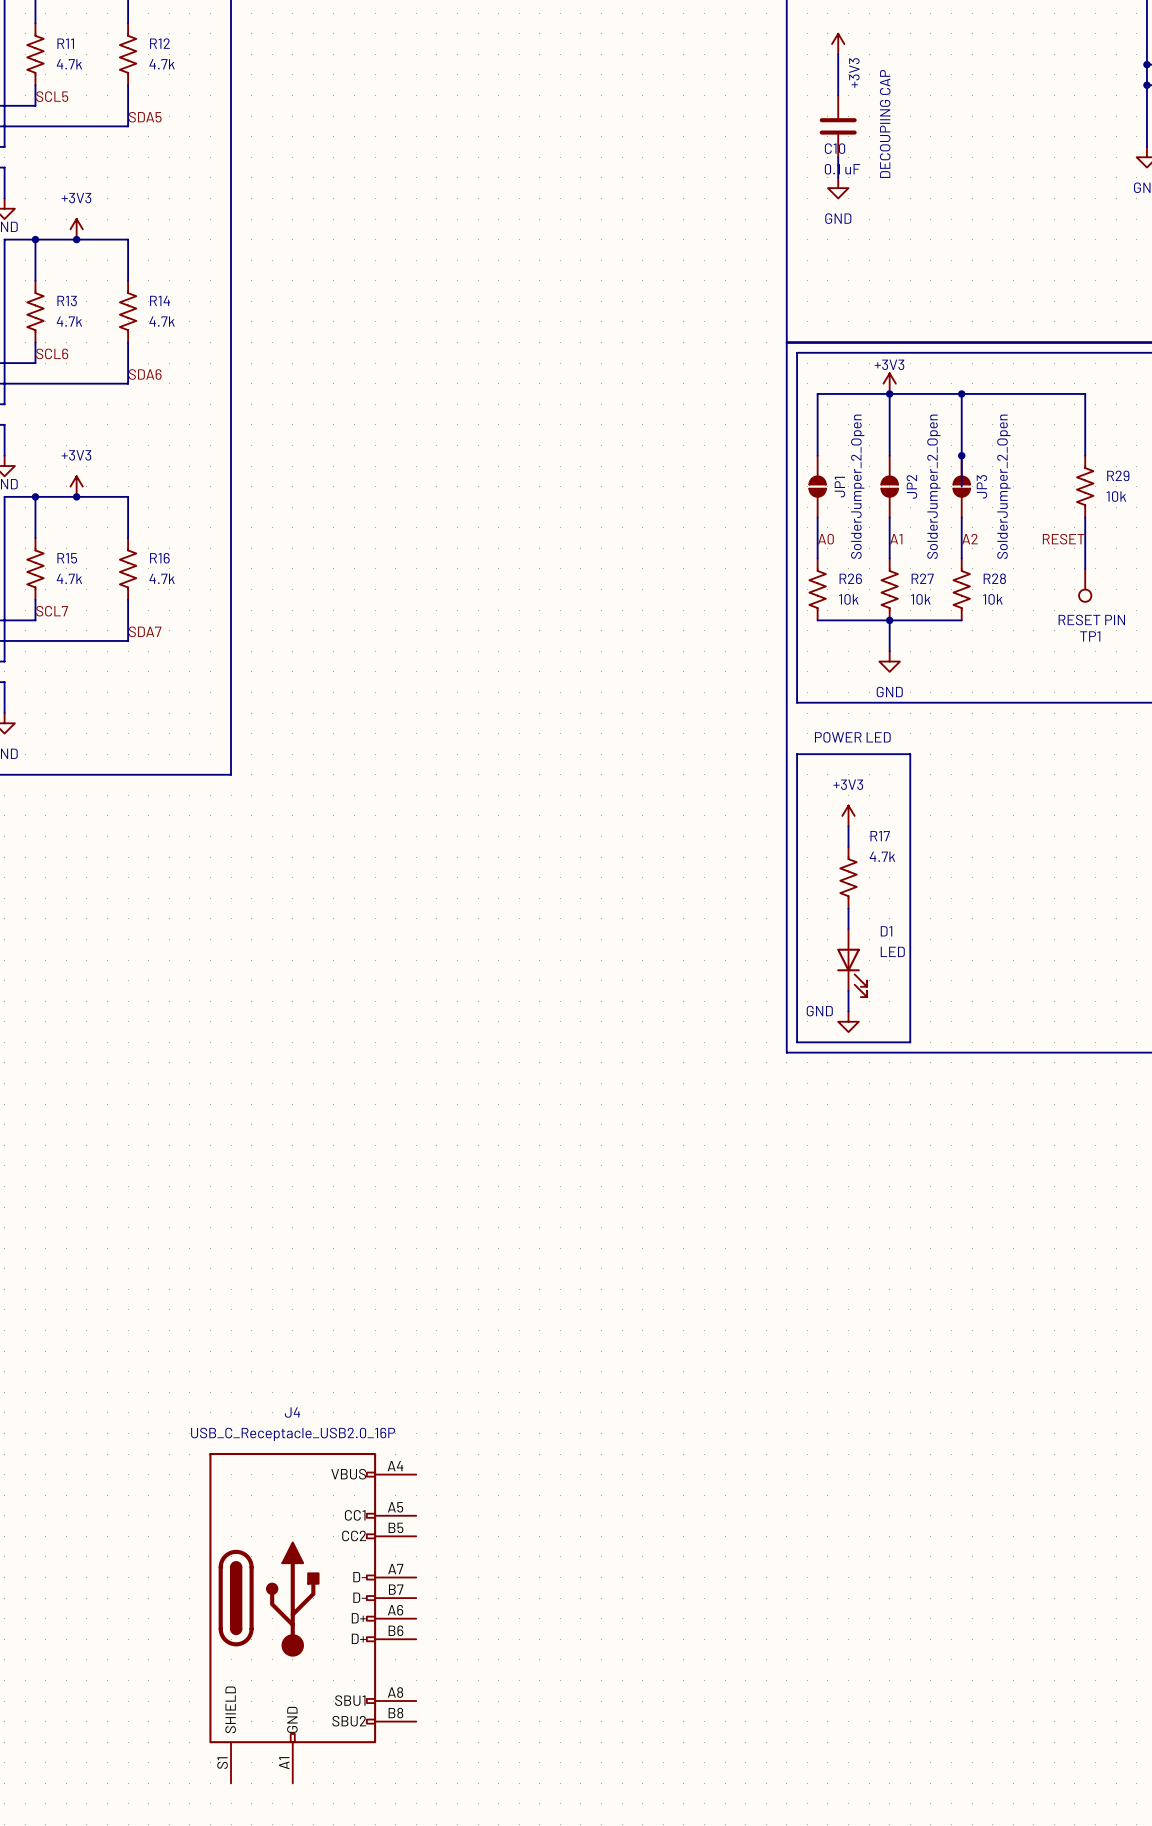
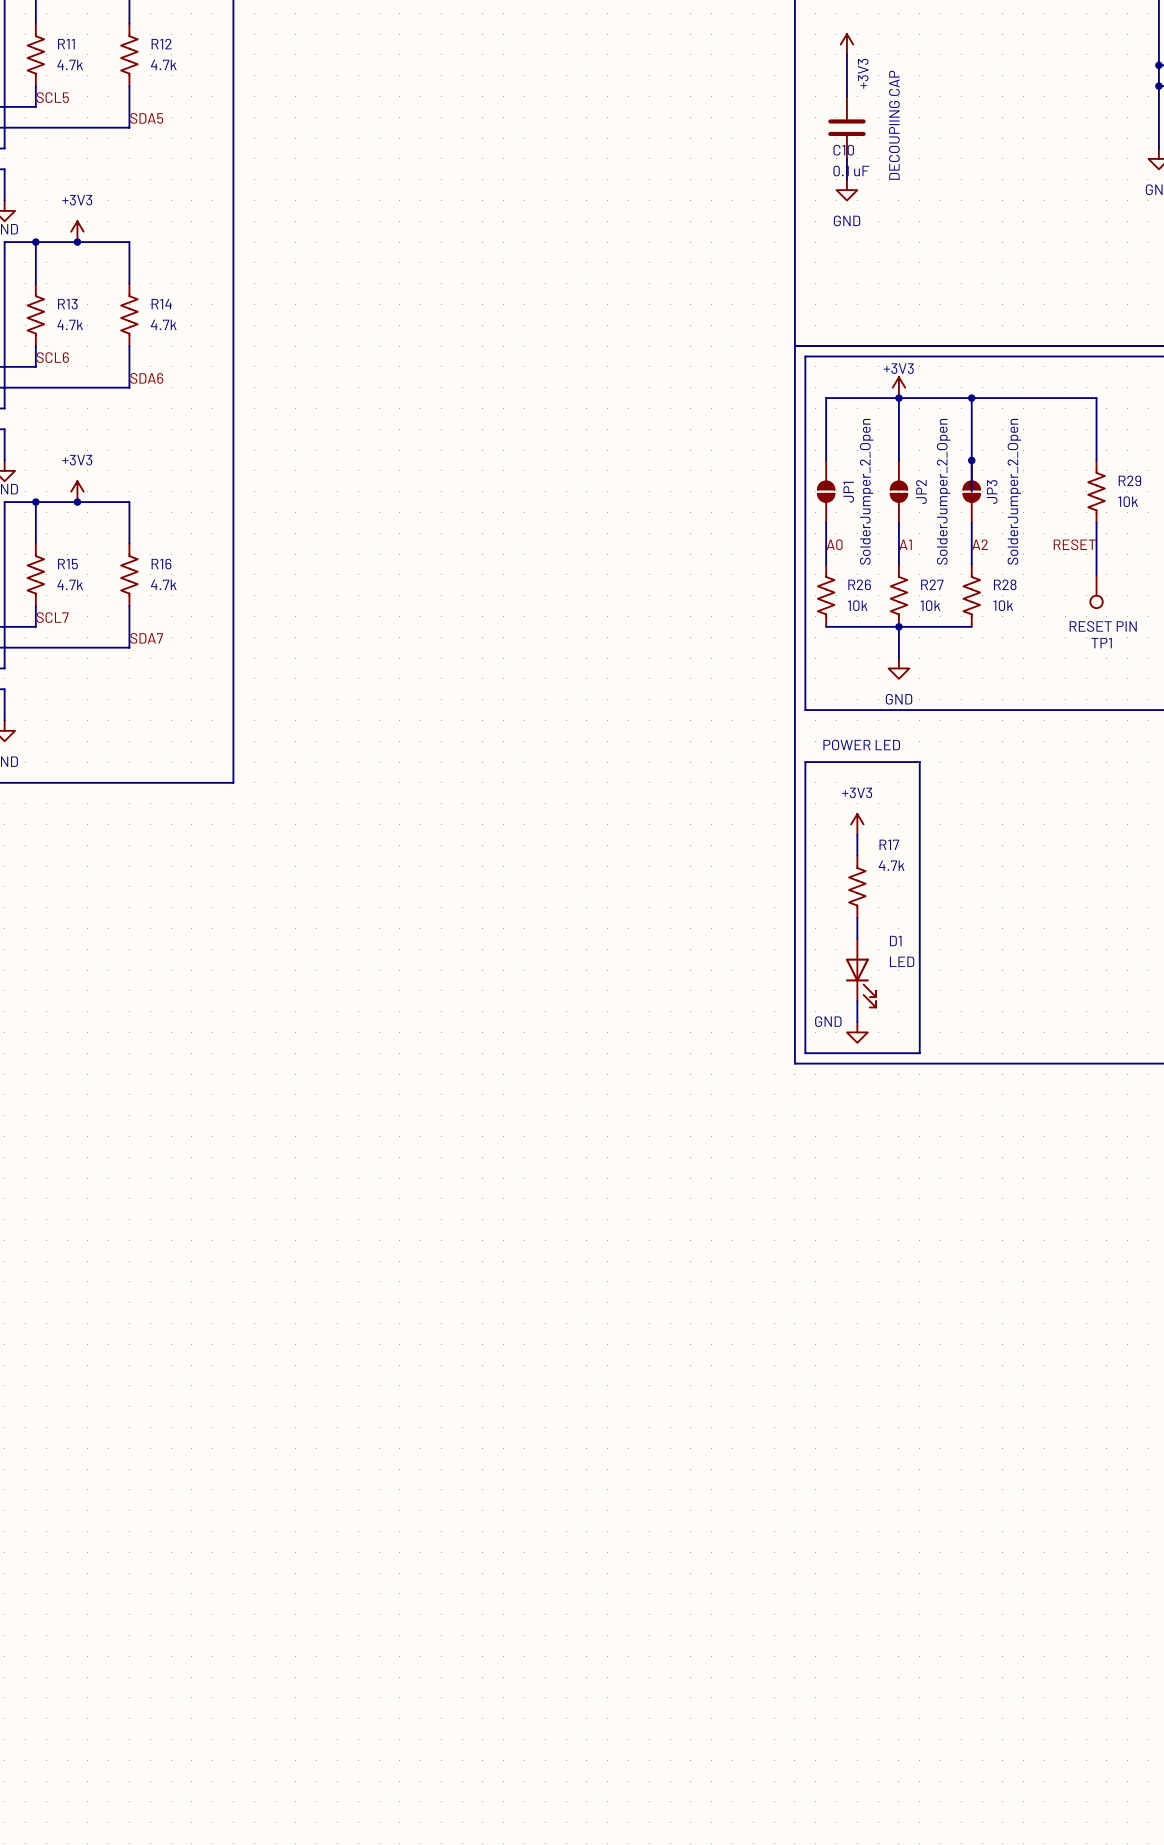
J4: USB_C_Receptacle_USB2.0_16P (312, 1618) -> none

